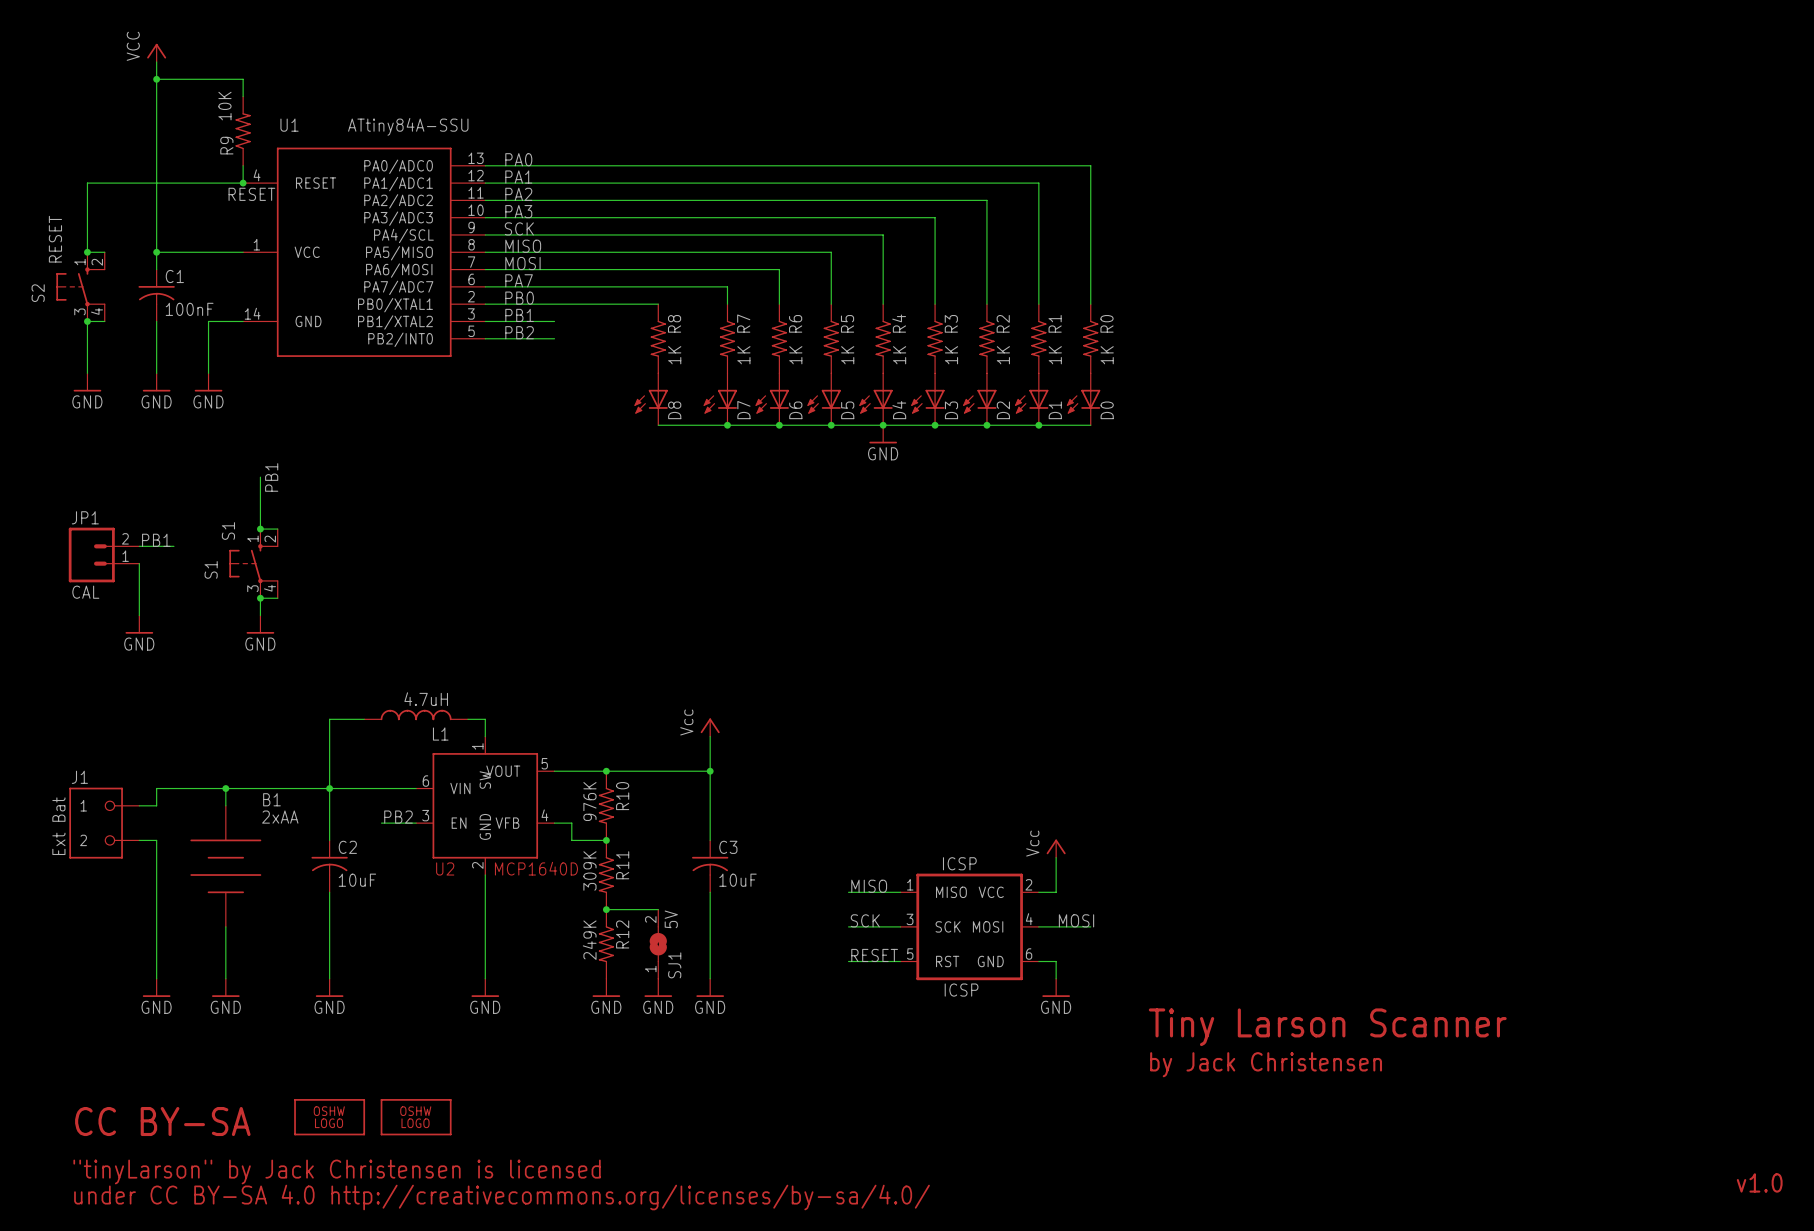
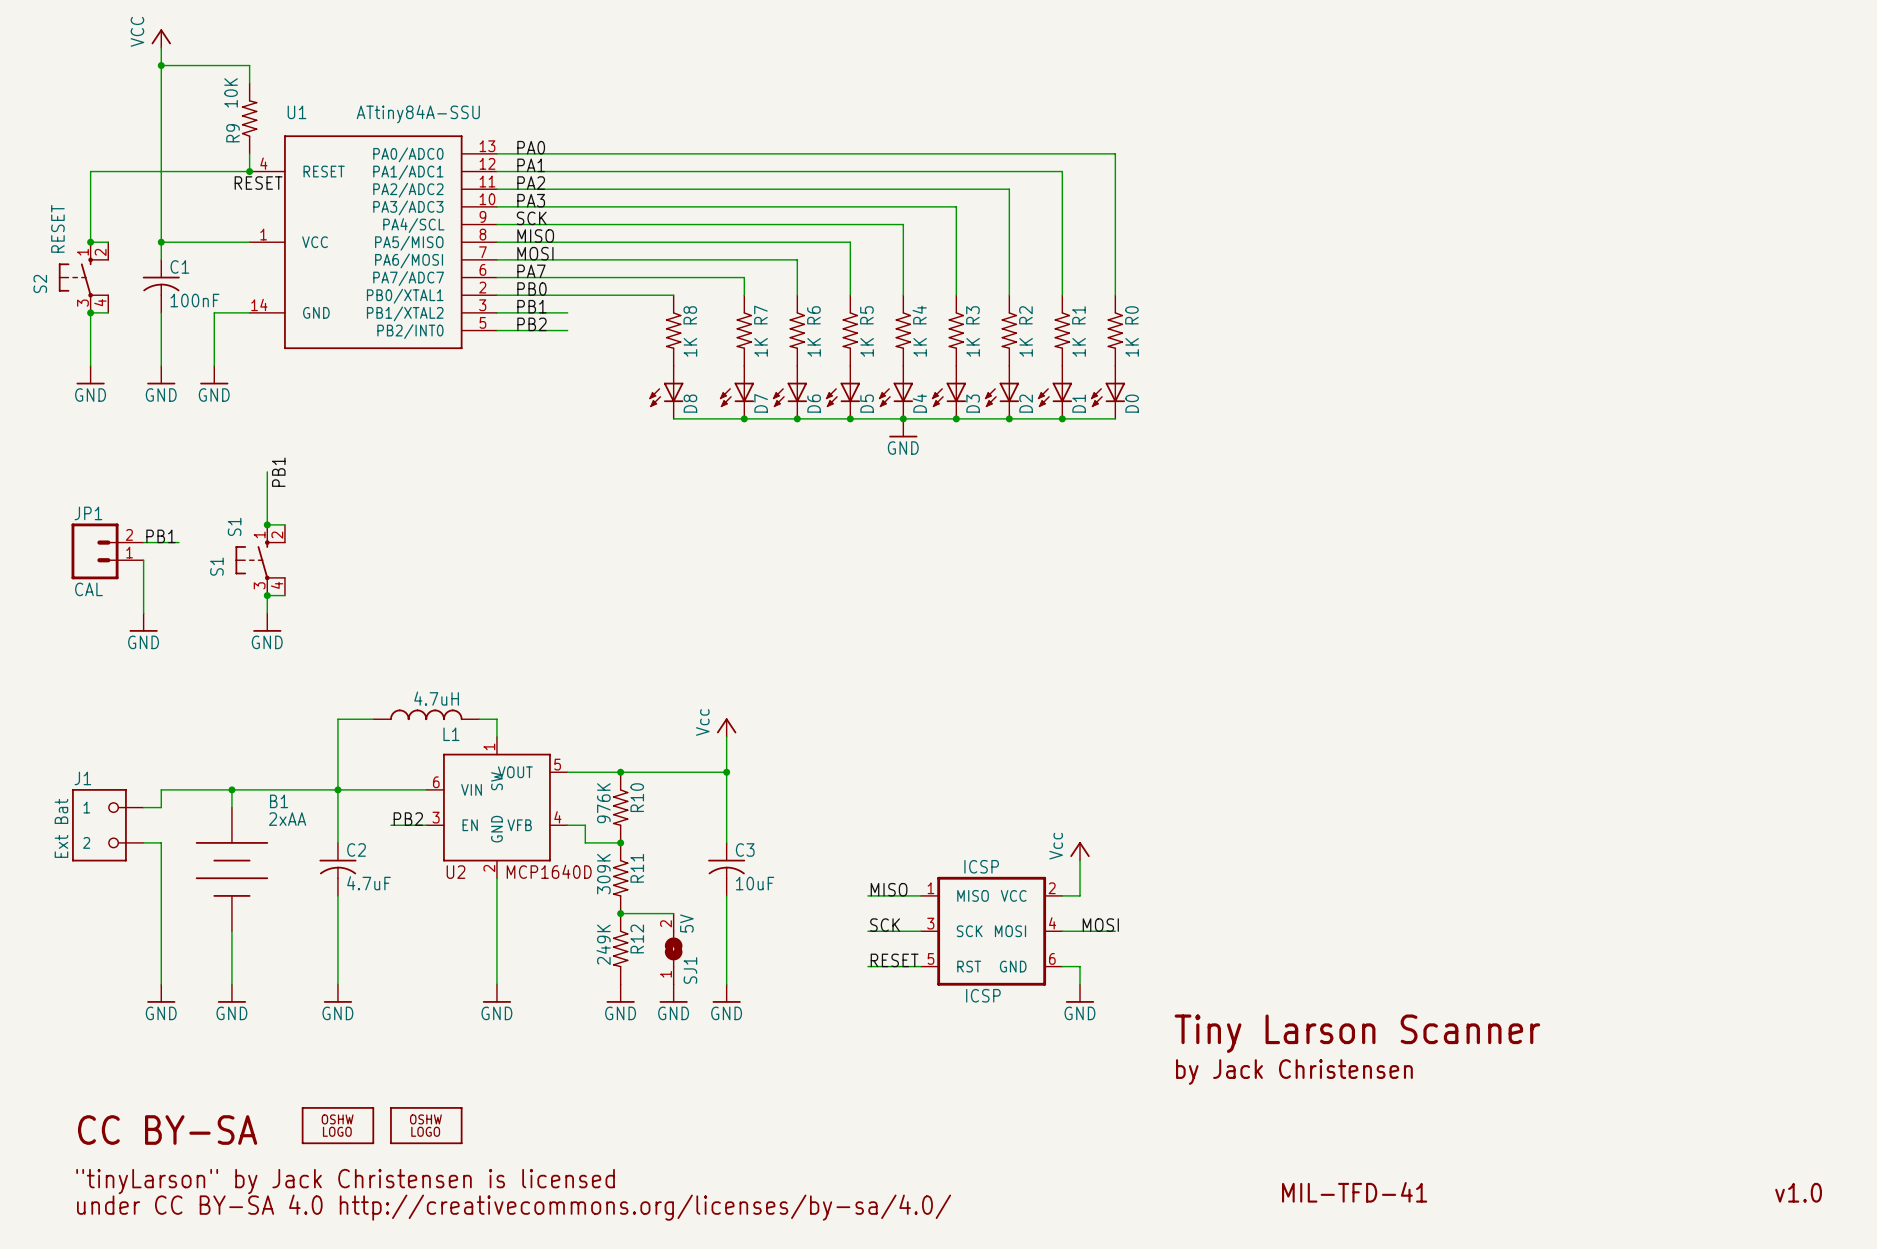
C2 value: 10uF (357, 880) -> 4.7uF (369, 883)
text: none -> MIL-TFD-41 (1354, 1192)

